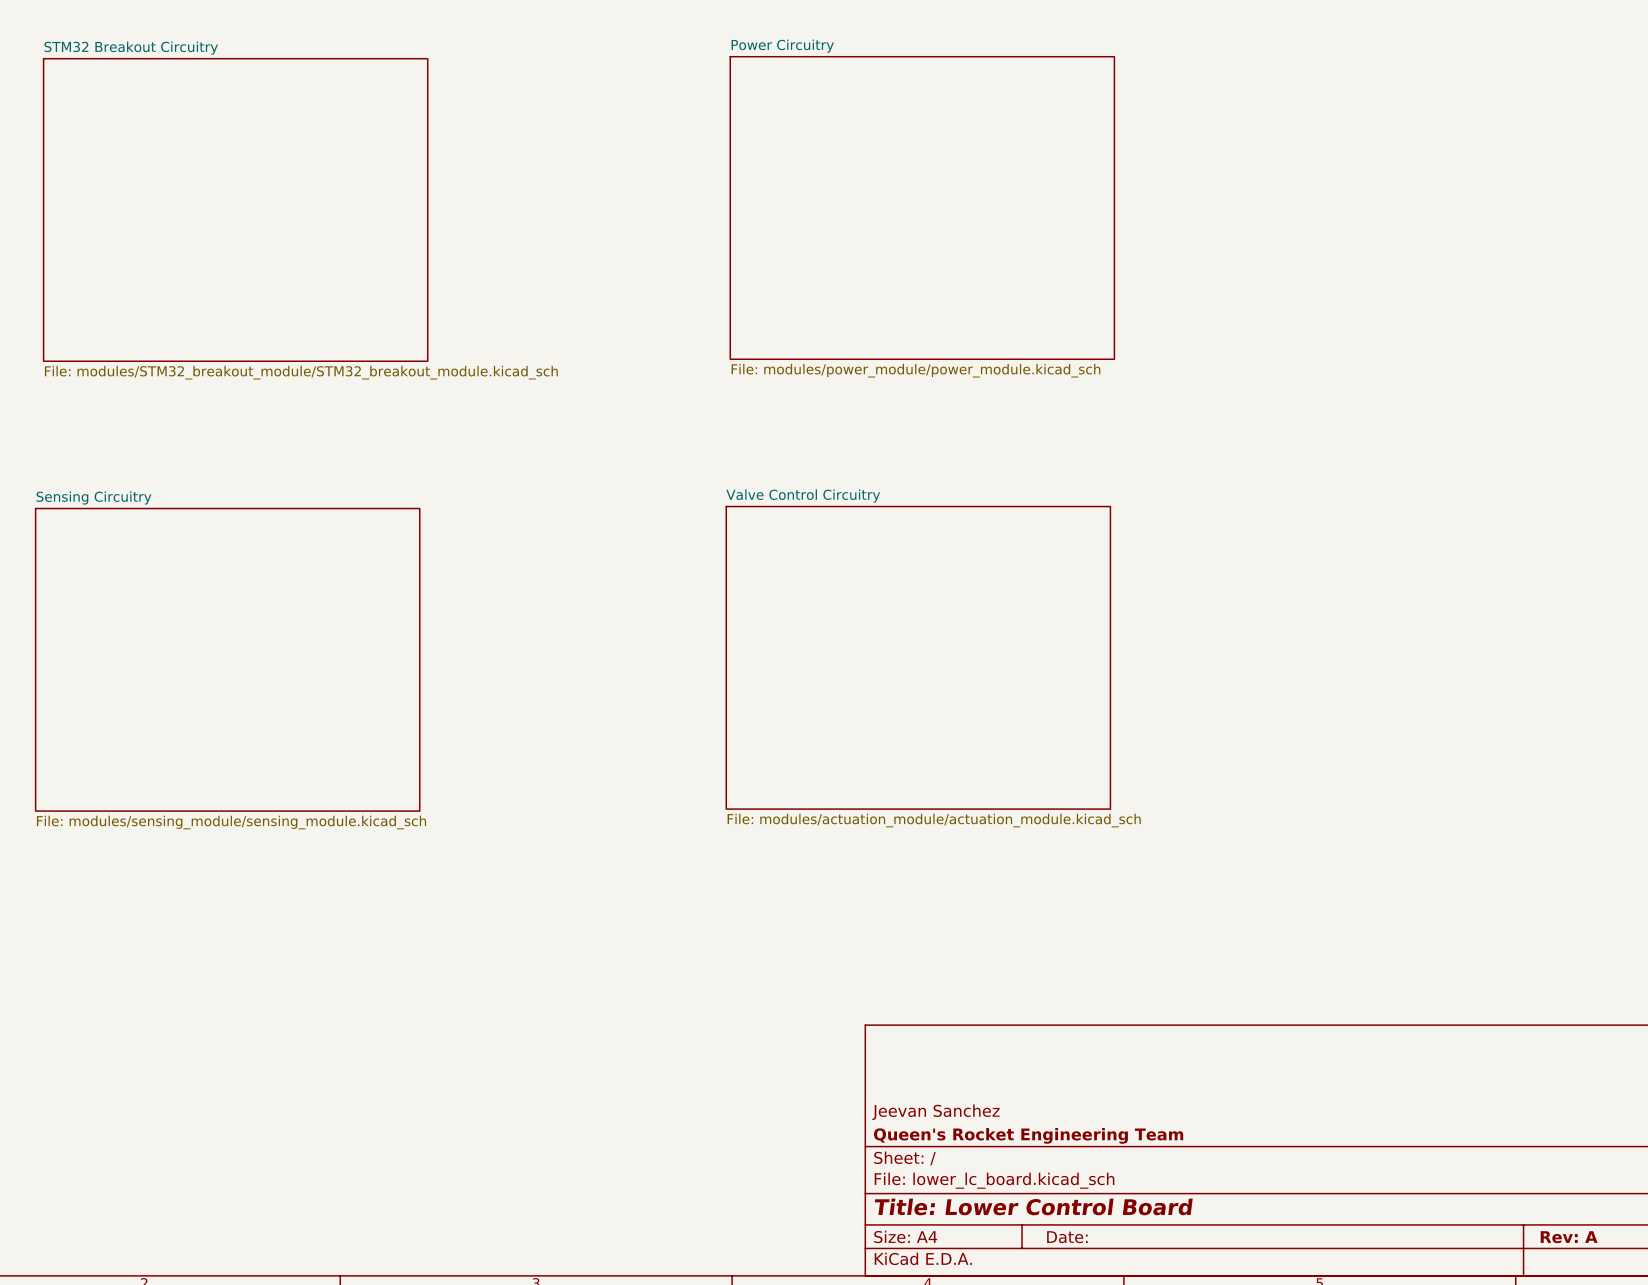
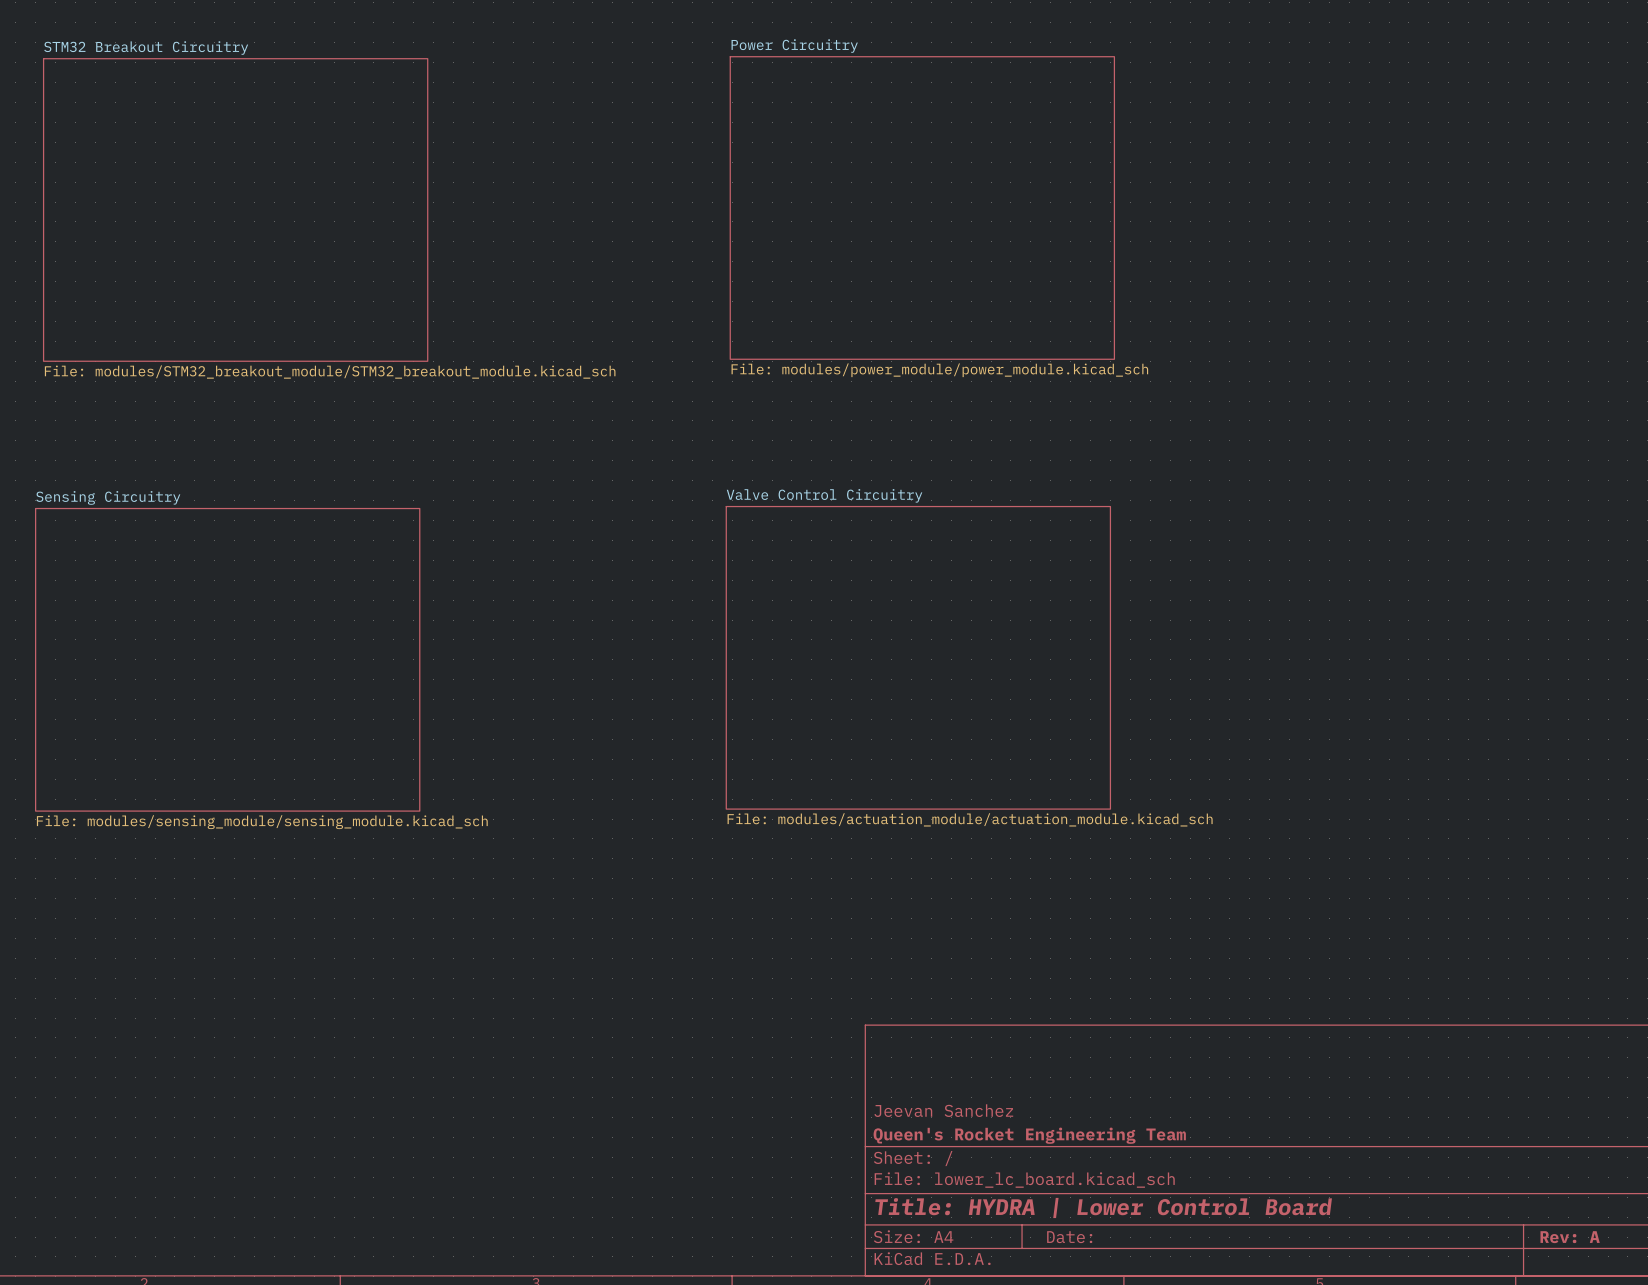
title block: Title: Lower Control Board (1033, 1206) -> Title: HYDRA | Lower Control Board (1103, 1207)

